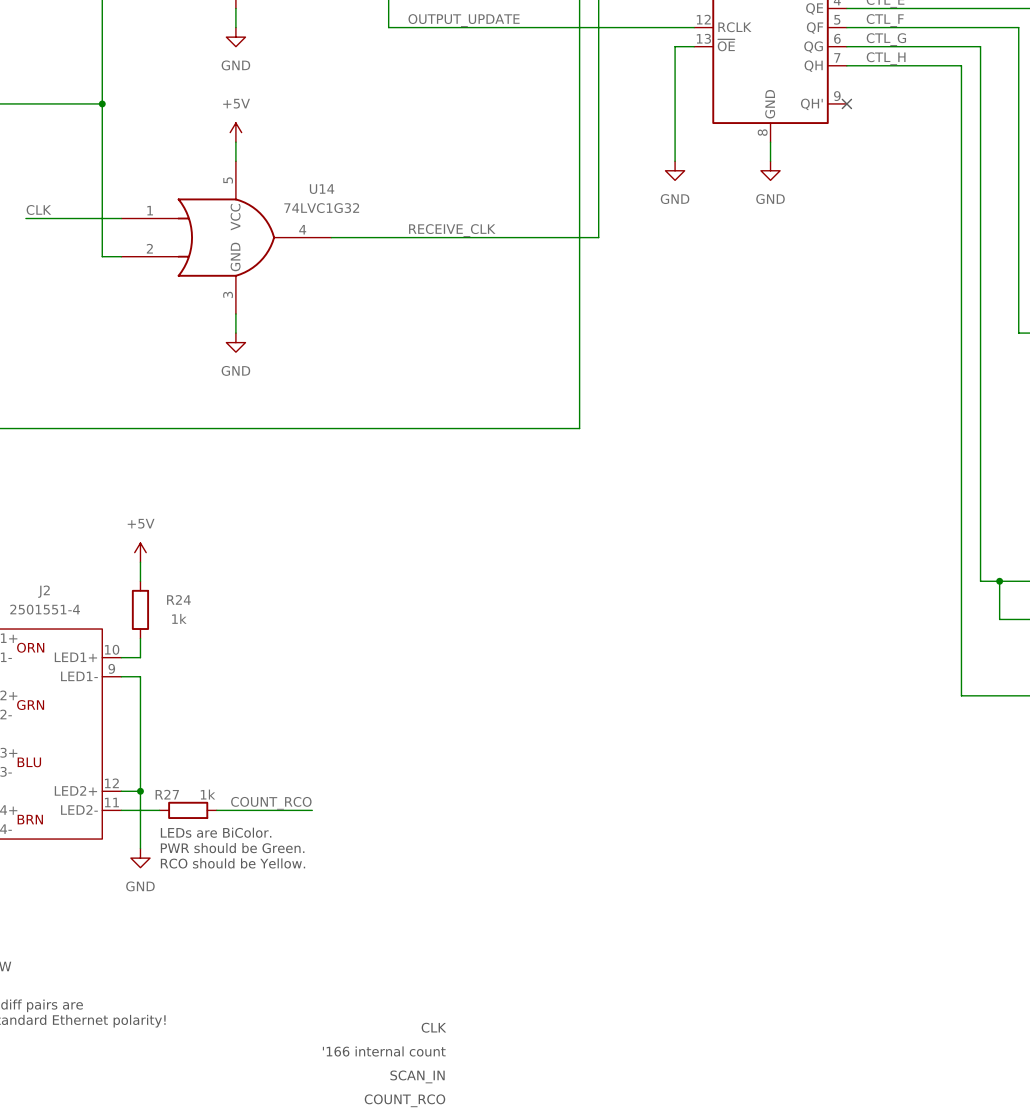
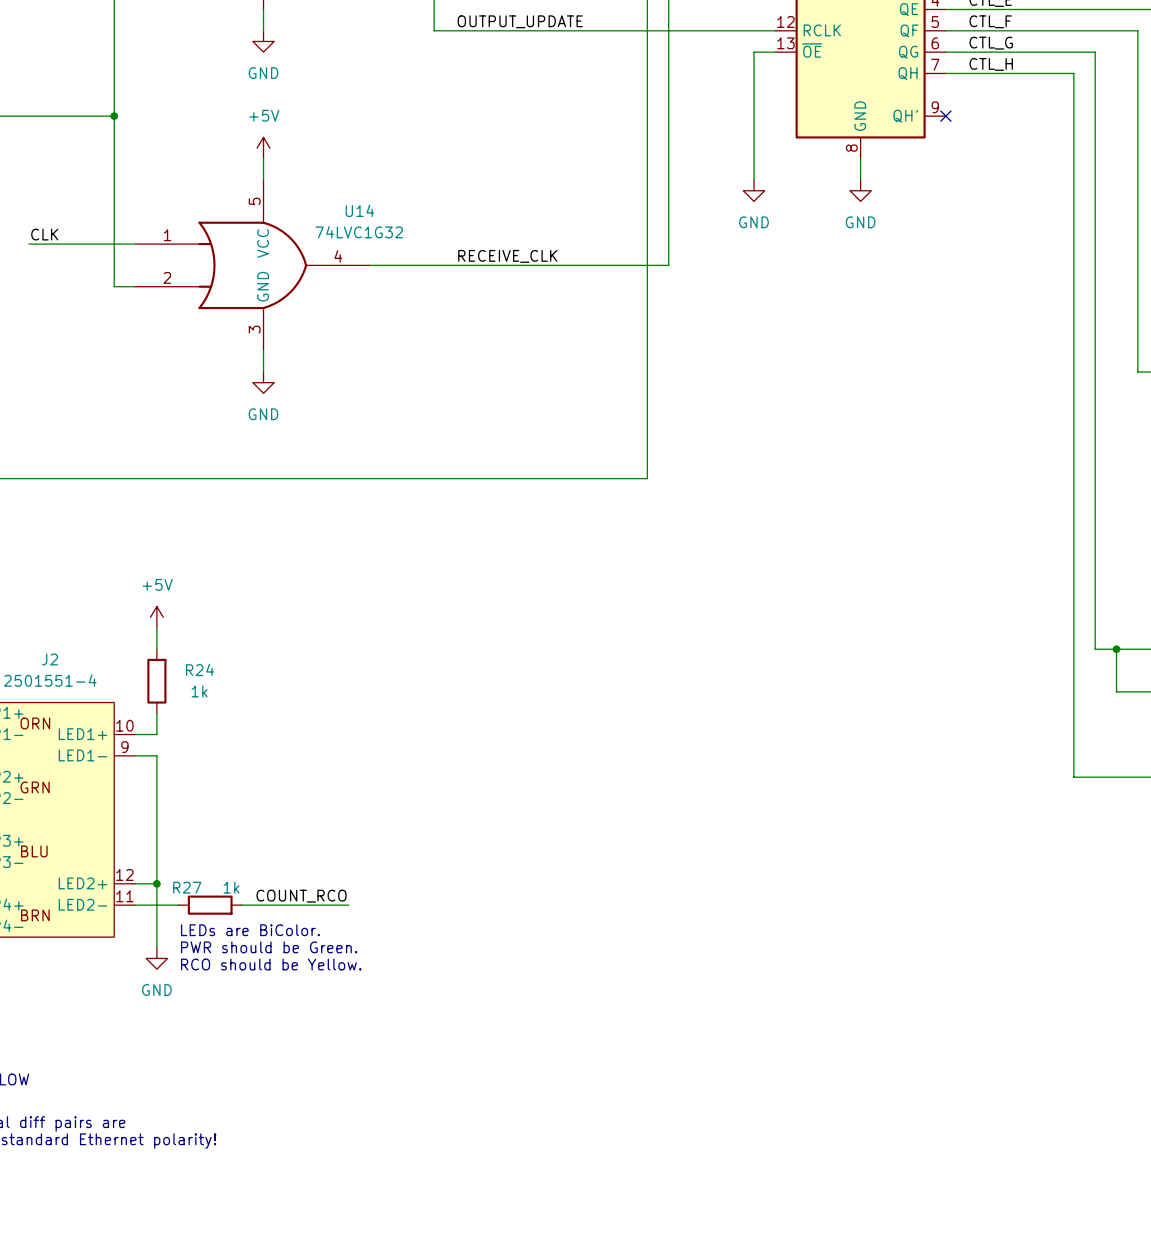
text: CLK (433, 1027) -> none
text: '166 internal count (384, 1051) -> none
text: SCAN_IN (417, 1076) -> none
text: COUNT_RCO (404, 1100) -> none

